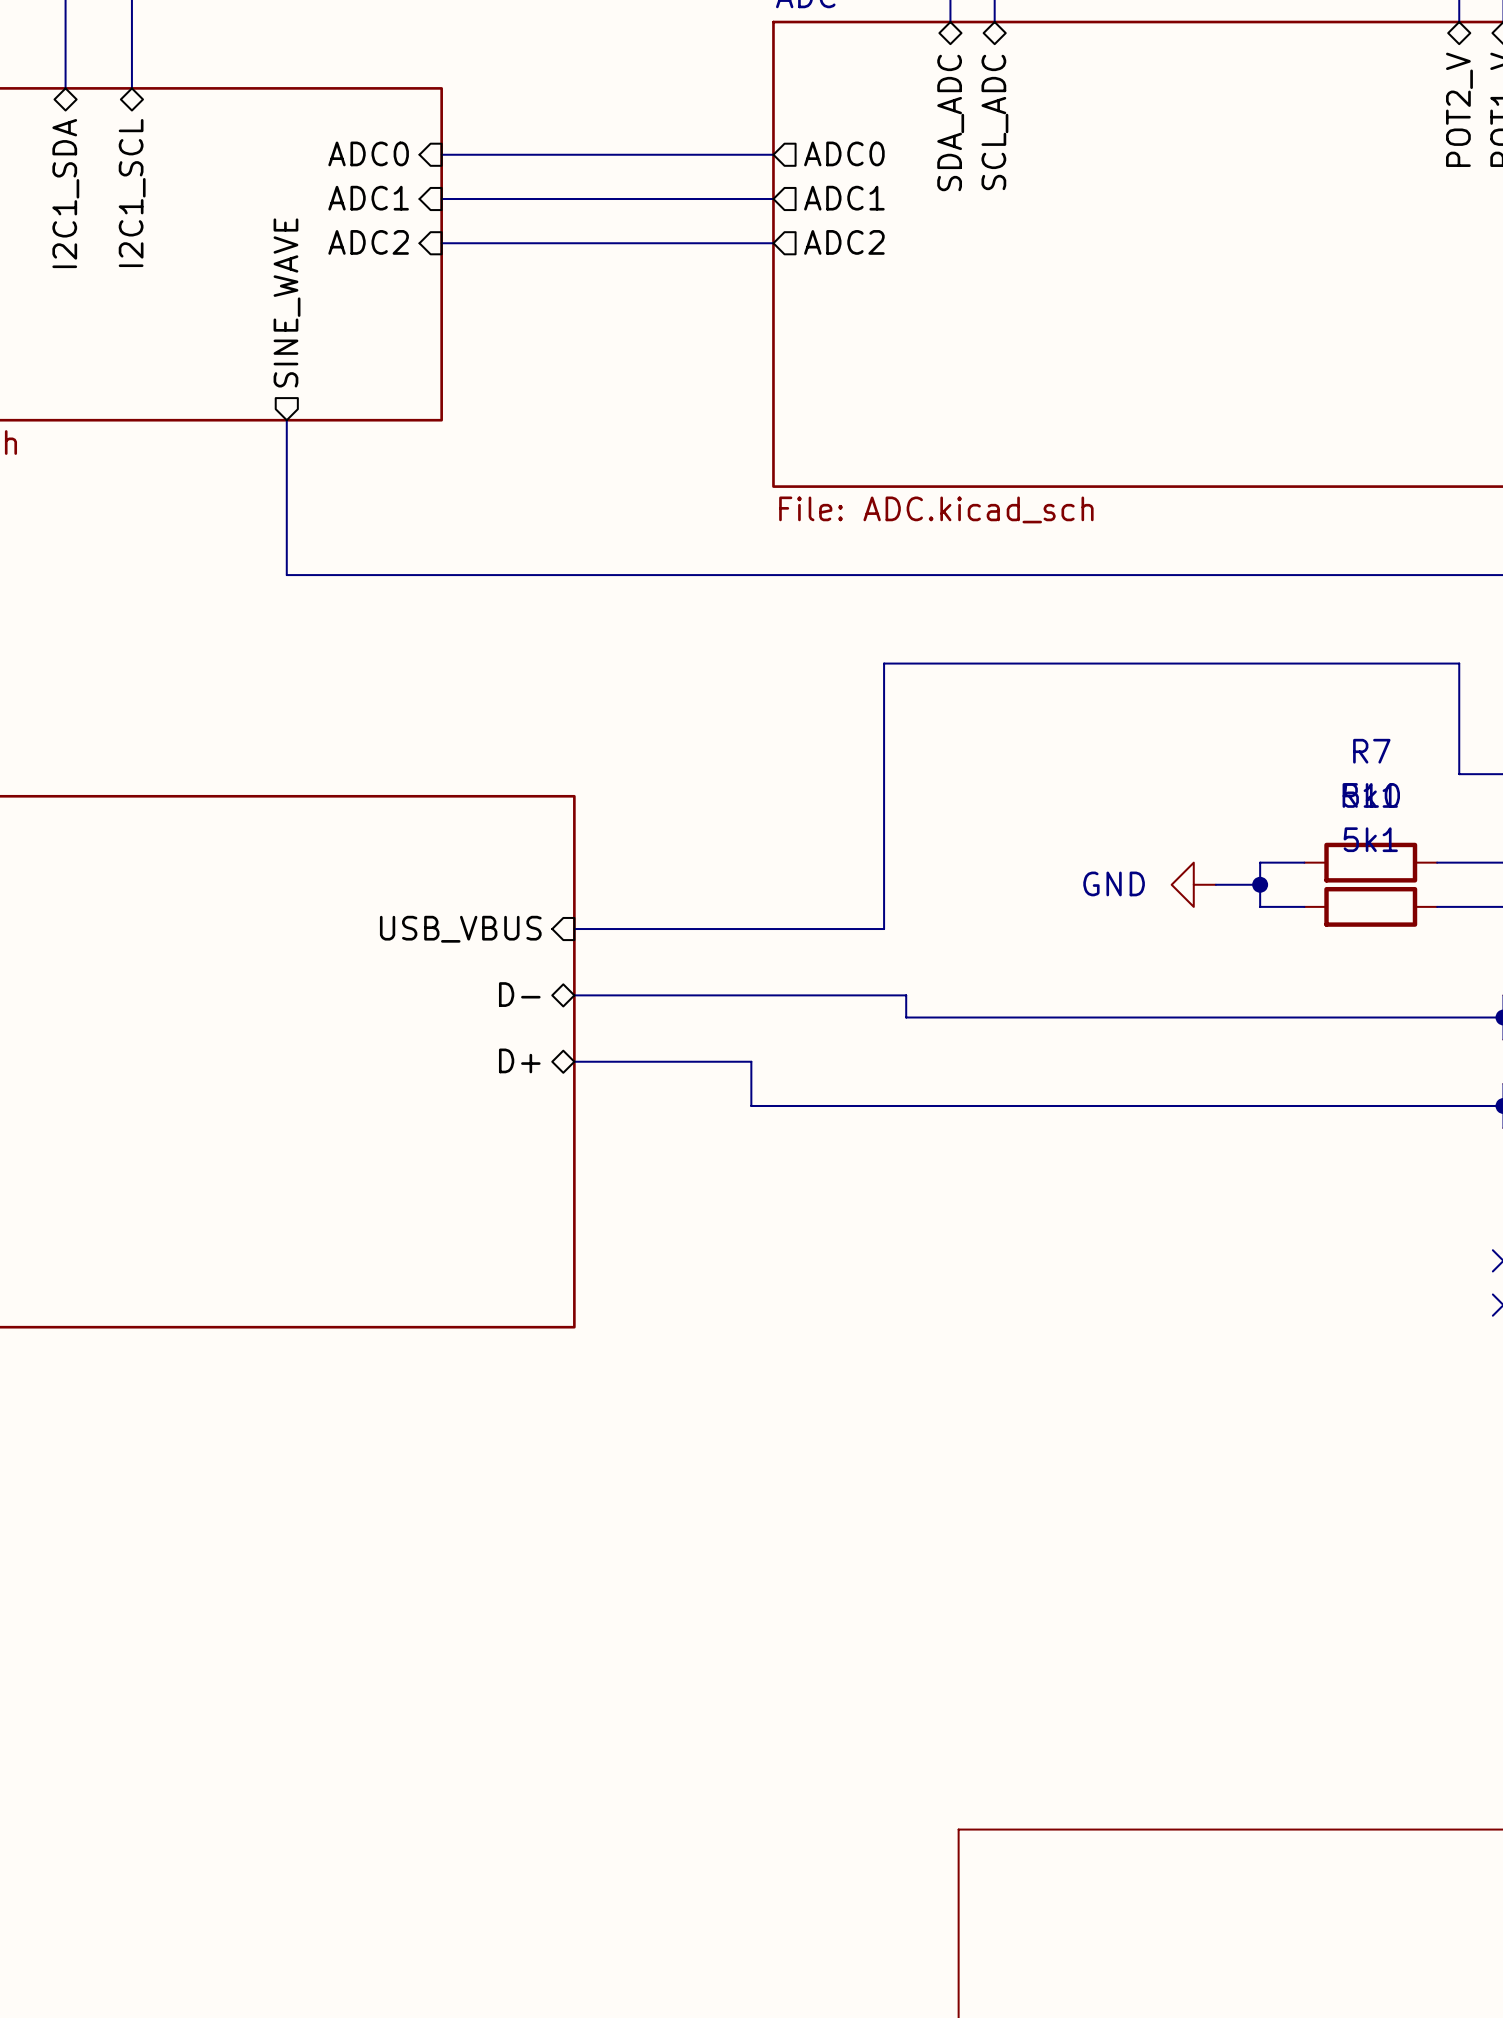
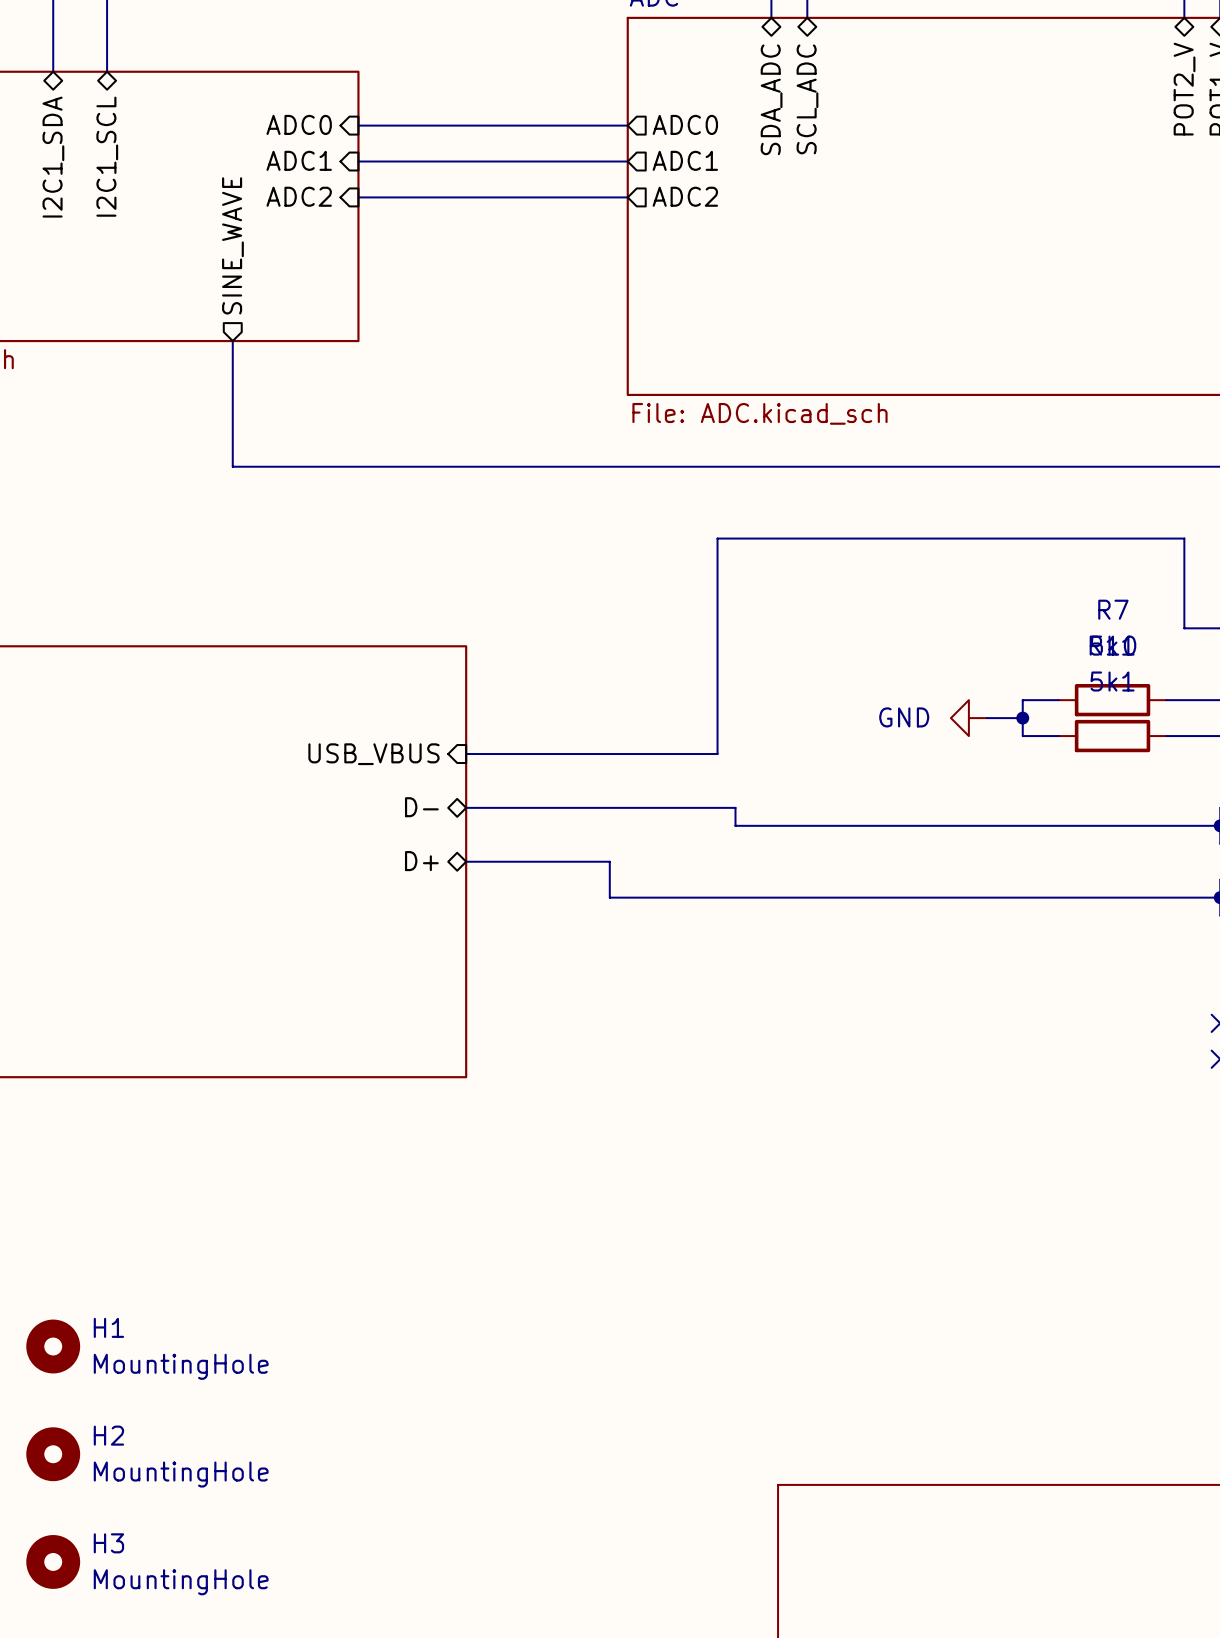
H1: none -> MountingHole (53, 1346)
H2: none -> MountingHole (53, 1454)
H3: none -> MountingHole (53, 1561)

